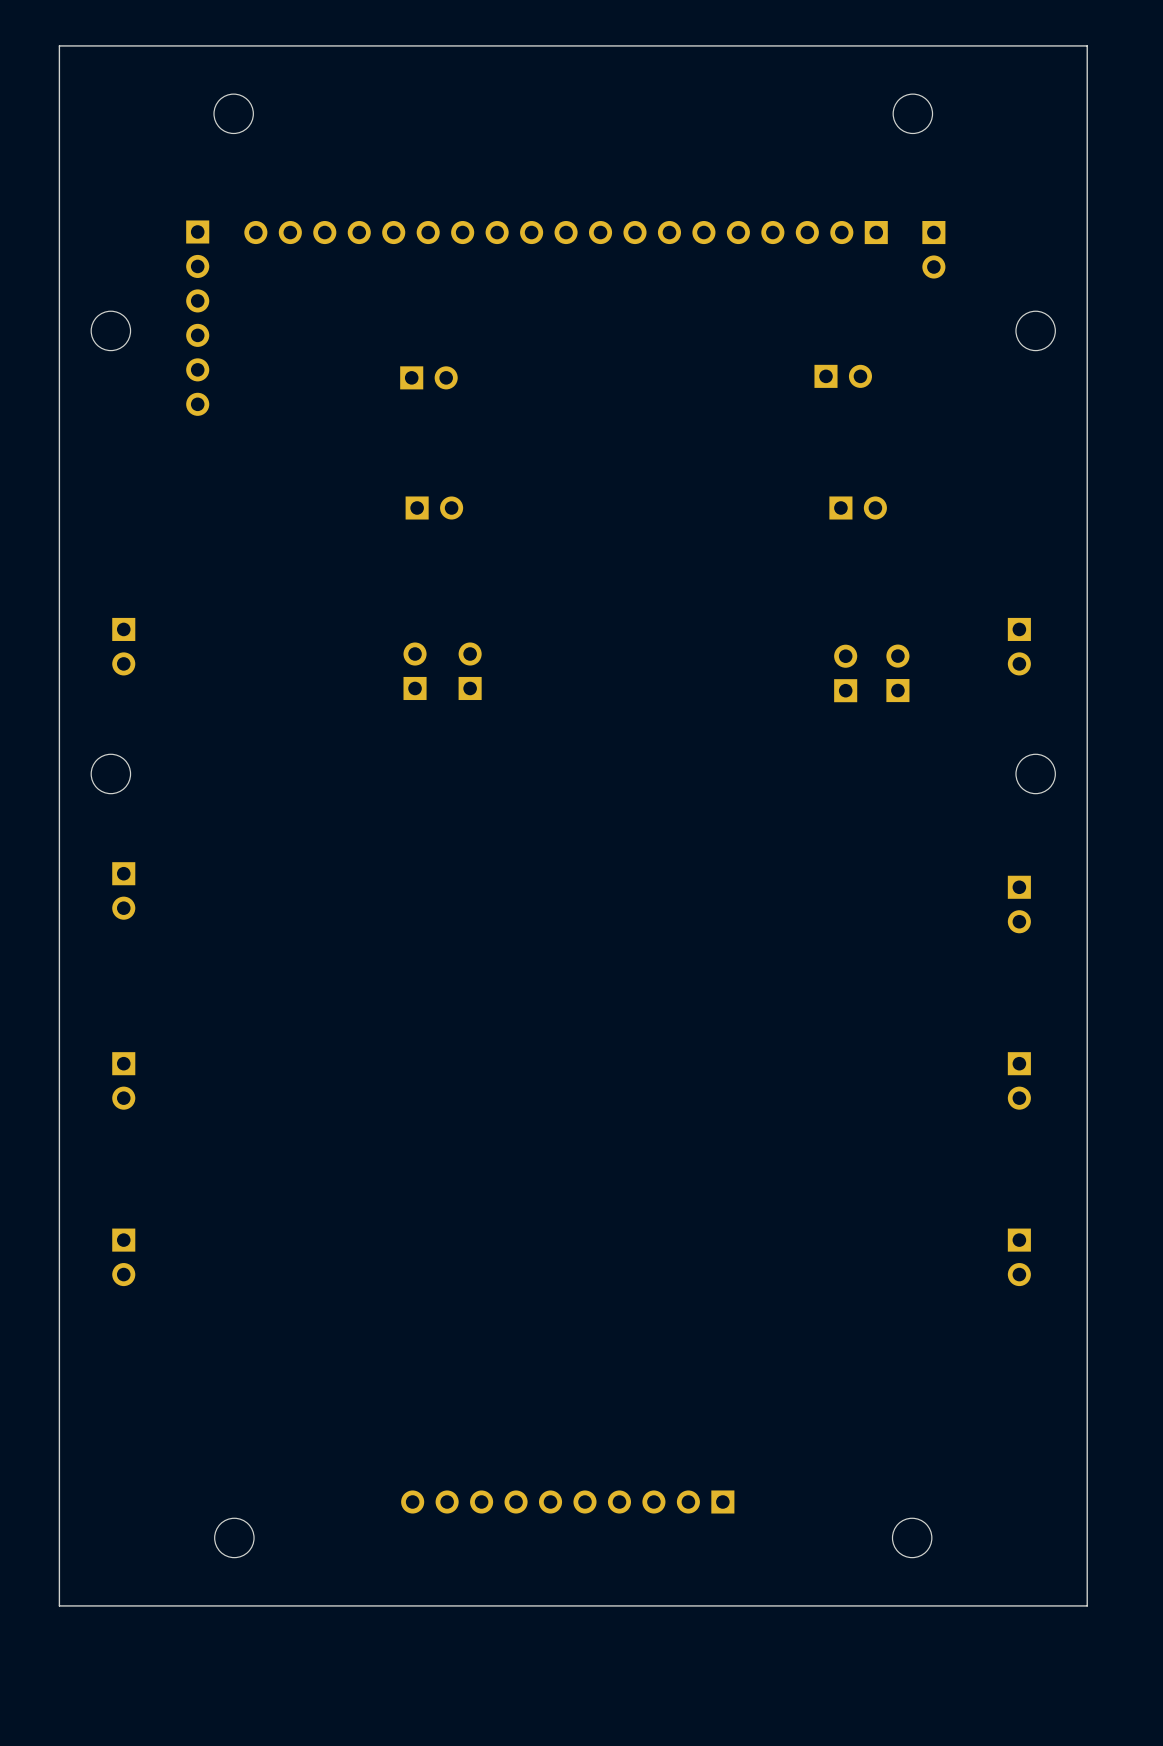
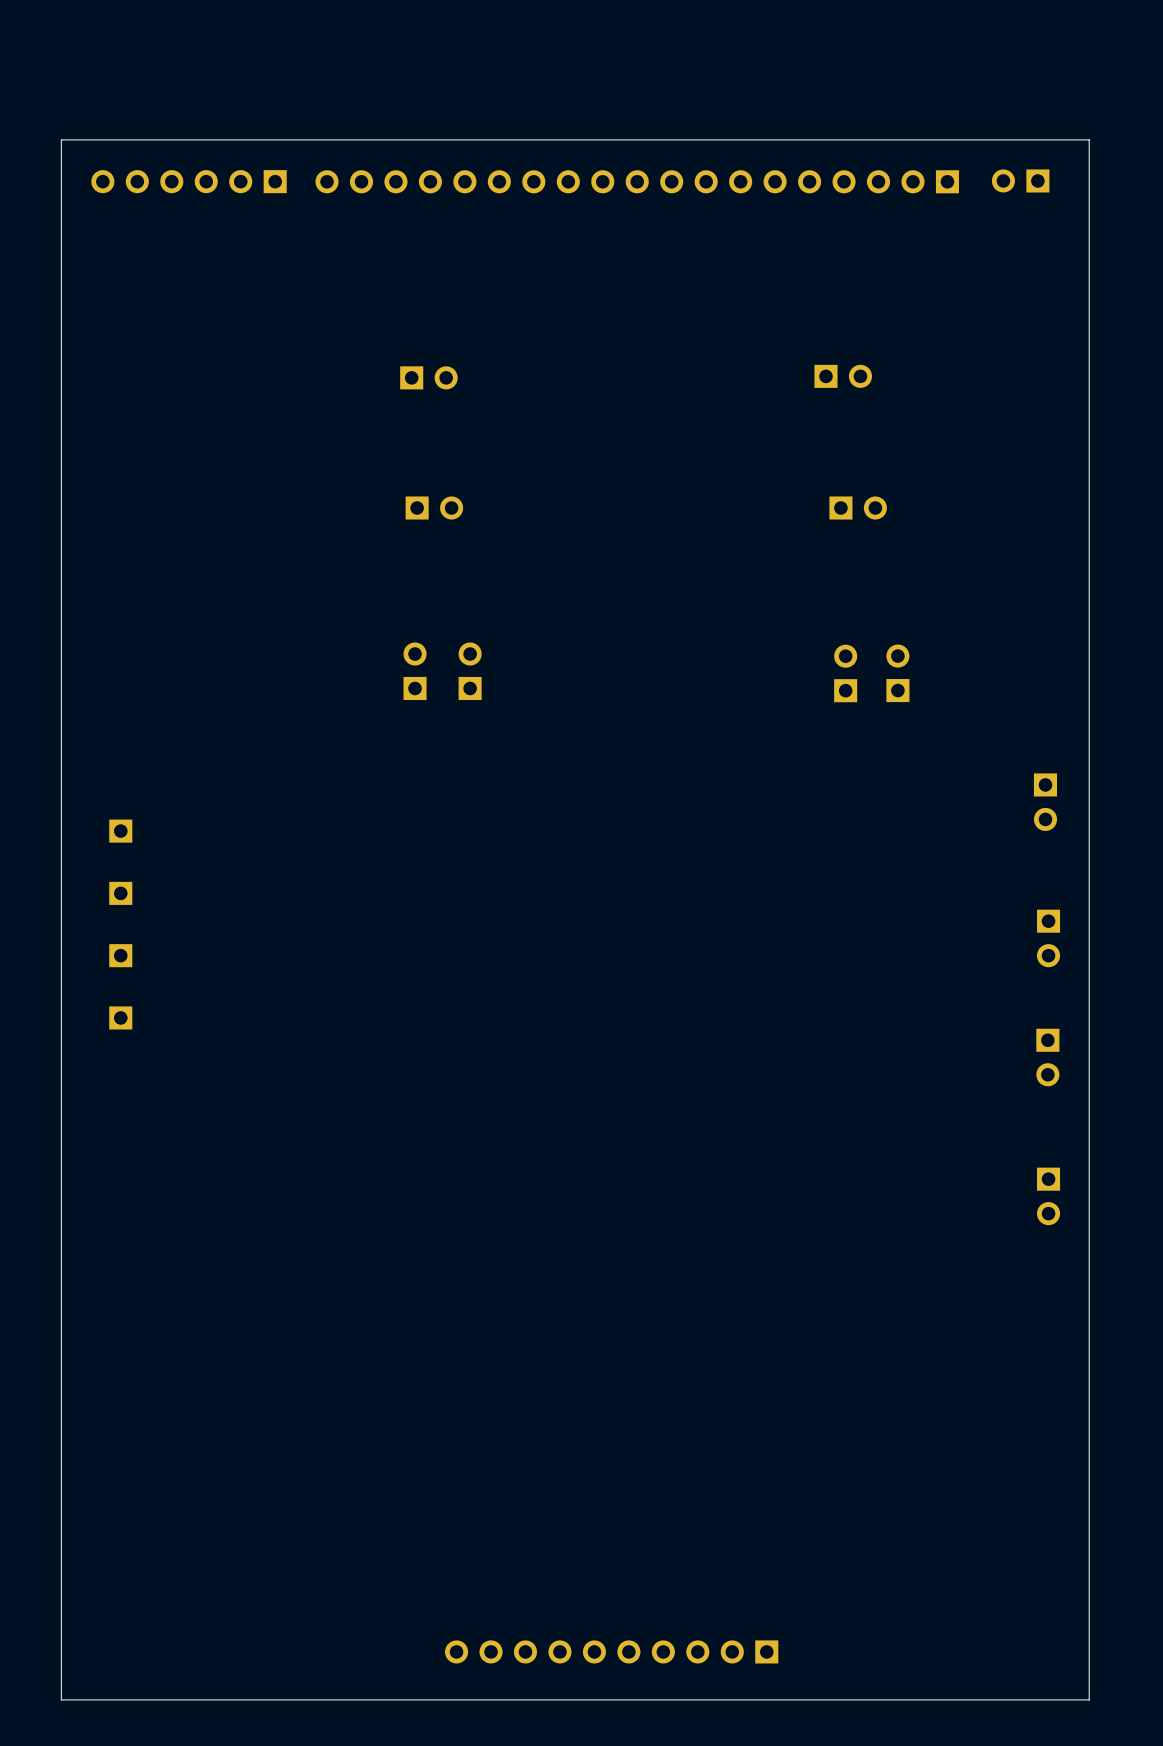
board edge: (1087, 45) (59, 45) (59, 1605) (1087, 1605) (1087, 45) -> (1089, 139) (61, 139) (61, 1699) (1089, 1699) (1089, 139)
round board edge: [213, 93, 254, 134] -> none
round board edge: [892, 93, 933, 134] -> none
part position: (566, 232) -> (637, 181)
part rotation: 0° (933, 249) -> 90° clockwise (1020, 180)
part position: (933, 249) -> (1020, 180)
round board edge: [90, 310, 131, 351] -> none
round board edge: [1015, 310, 1056, 351] -> none
part rotation: 0° (197, 318) -> 90° clockwise (189, 181)
part position: (197, 318) -> (189, 181)
part: (123, 646) -> none
part: (1019, 646) -> none
round board edge: [90, 753, 131, 794] -> none
round board edge: [1015, 753, 1056, 794] -> none
part: none -> (1045, 802)
part: none -> (120, 831)
part footprint: [112, 862, 136, 920] -> [109, 881, 133, 905]
part position: (1019, 904) -> (1048, 938)
part: none -> (120, 955)
part: none -> (120, 1017)
part: (123, 1080) -> none
part position: (1019, 1080) -> (1047, 1057)
part: none -> (1048, 1196)
part: (123, 1257) -> none
part: (1019, 1257) -> none
part position: (567, 1501) -> (611, 1651)
round board edge: [214, 1517, 255, 1558] -> none
round board edge: [892, 1517, 933, 1558] -> none

